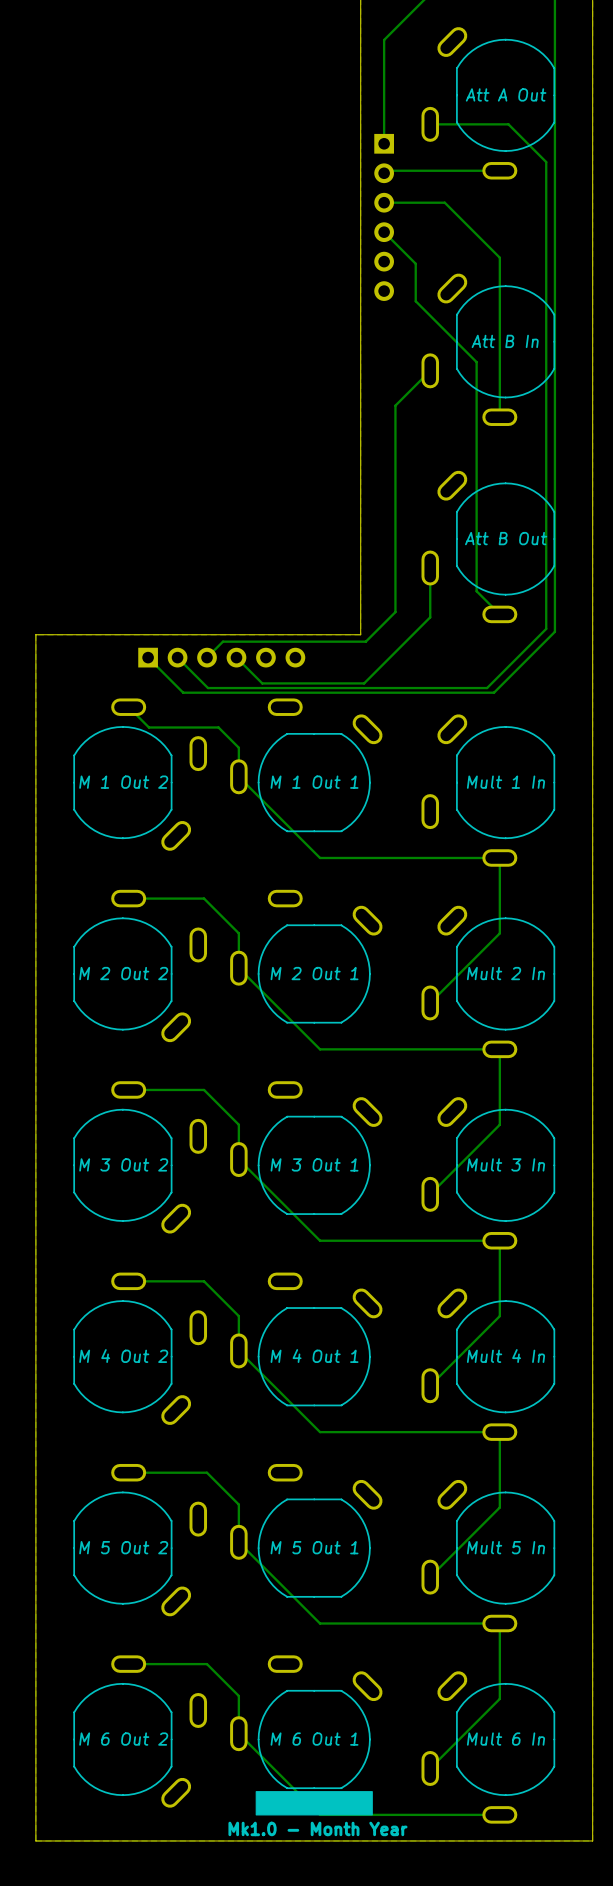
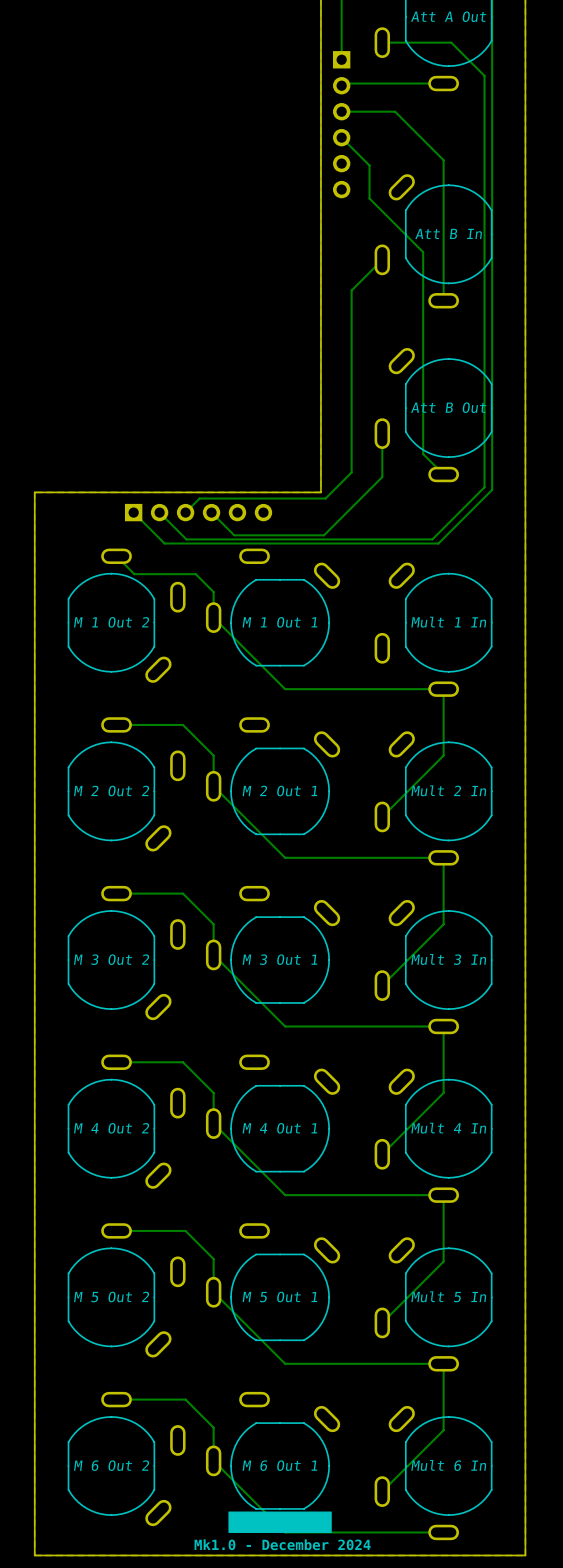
text: Mk1.0 - Month Year (317, 1828) -> Mk1.0 - December 2024 (282, 1544)

